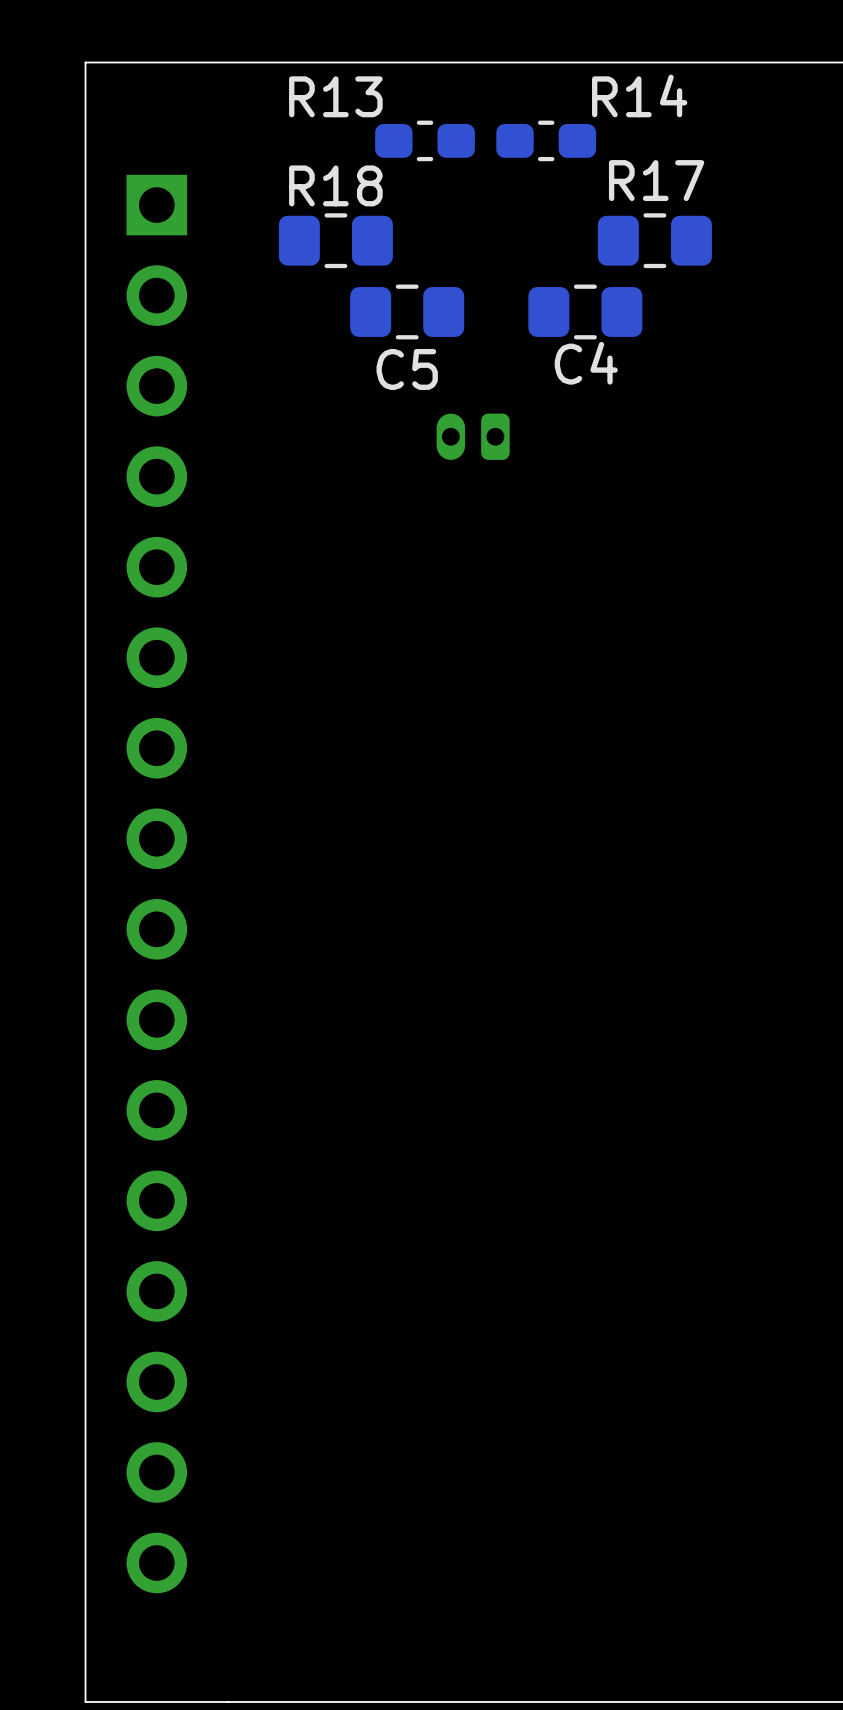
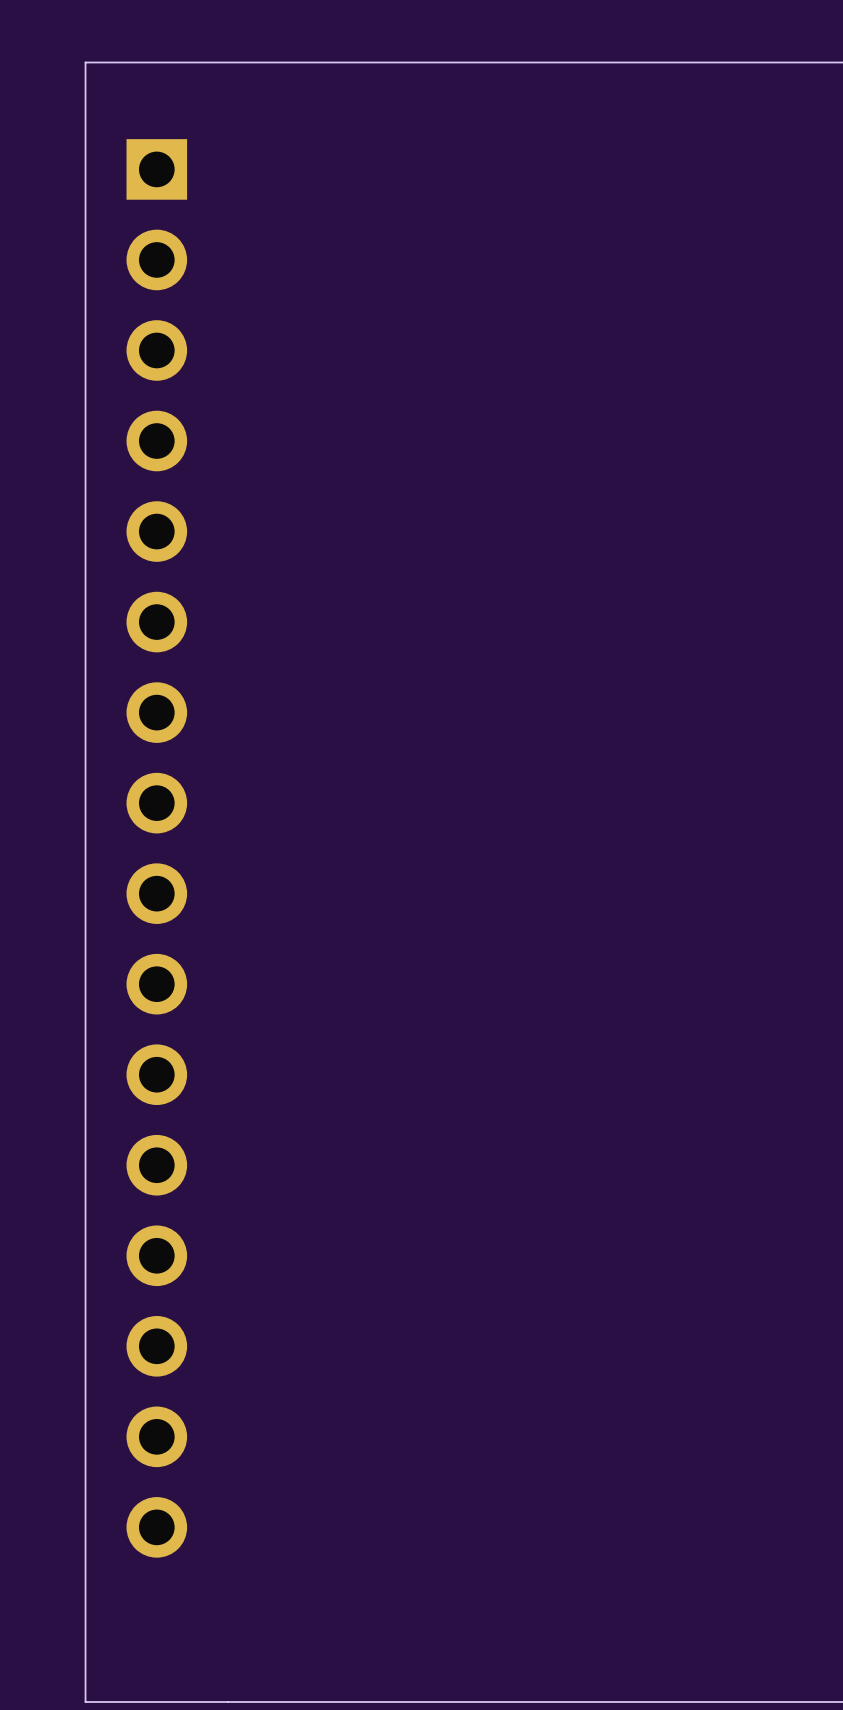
R13: (425, 140) -> none
R14: (546, 140) -> none
R18: (335, 240) -> none
R17: (654, 240) -> none
C5: (407, 311) -> none
C4: (585, 311) -> none
part: (473, 436) -> none
part position: (156, 884) -> (156, 848)

